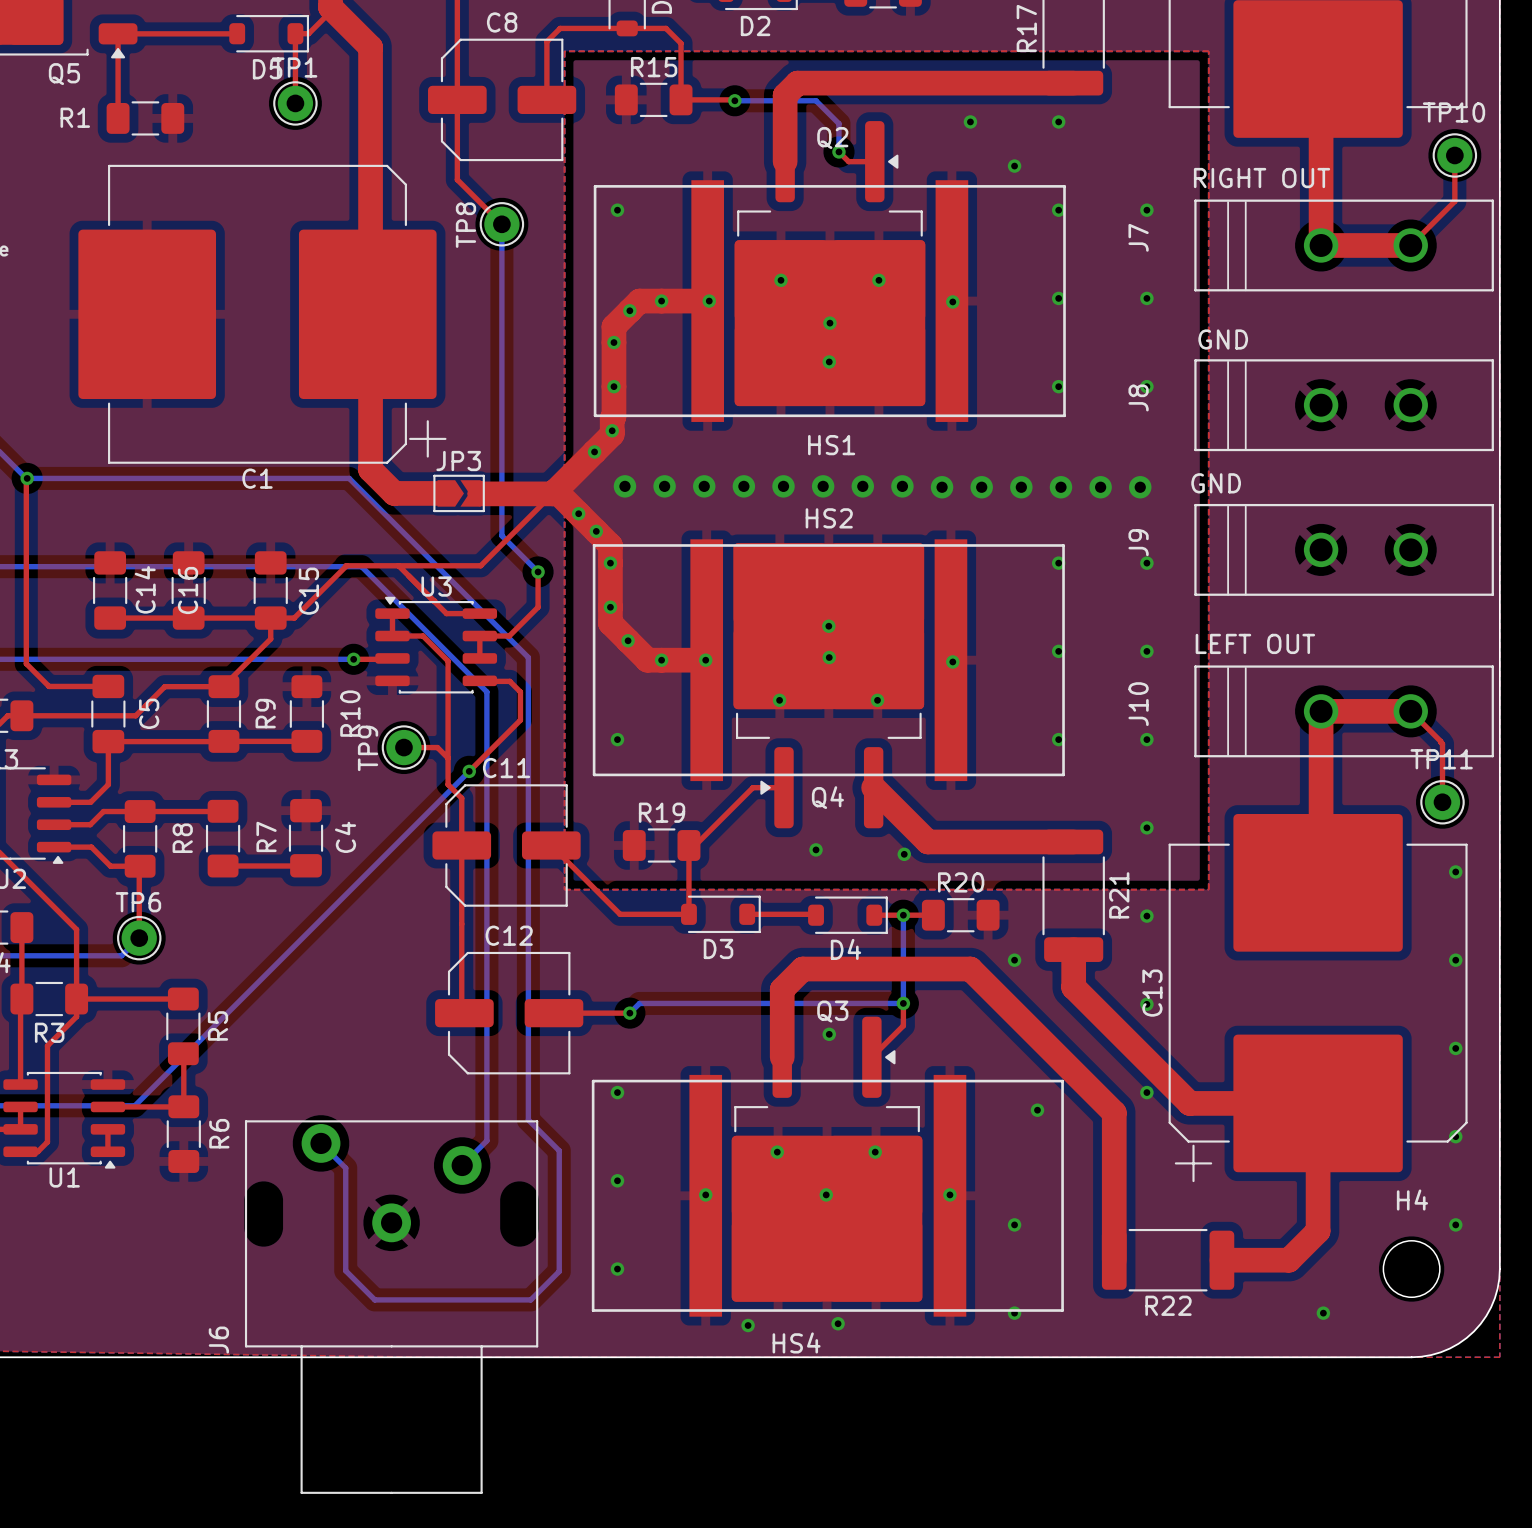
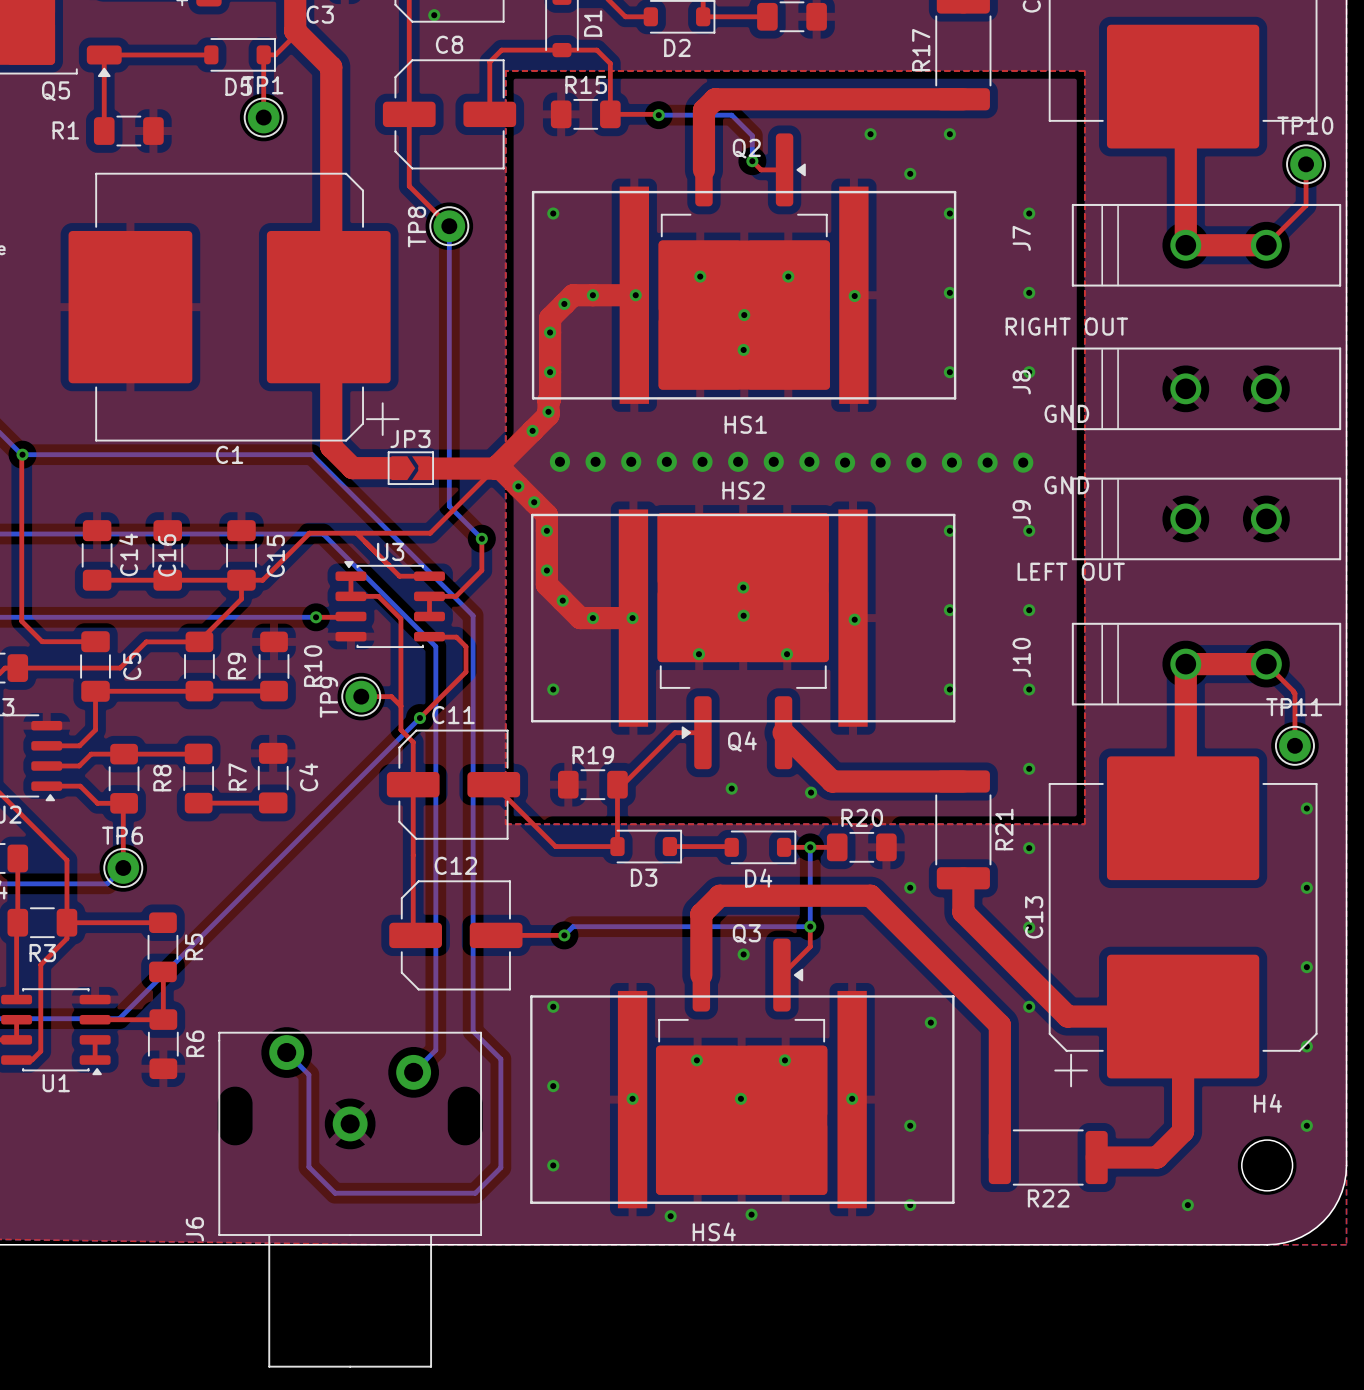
text position: RIGHT OUT (1262, 178) -> RIGHT OUT (1066, 326)
text: GND (1223, 339) -> none
text: none -> GND (1066, 413)
text position: GND (1216, 483) -> GND (1066, 485)
text position: LEFT OUT (1255, 643) -> LEFT OUT (1071, 571)

